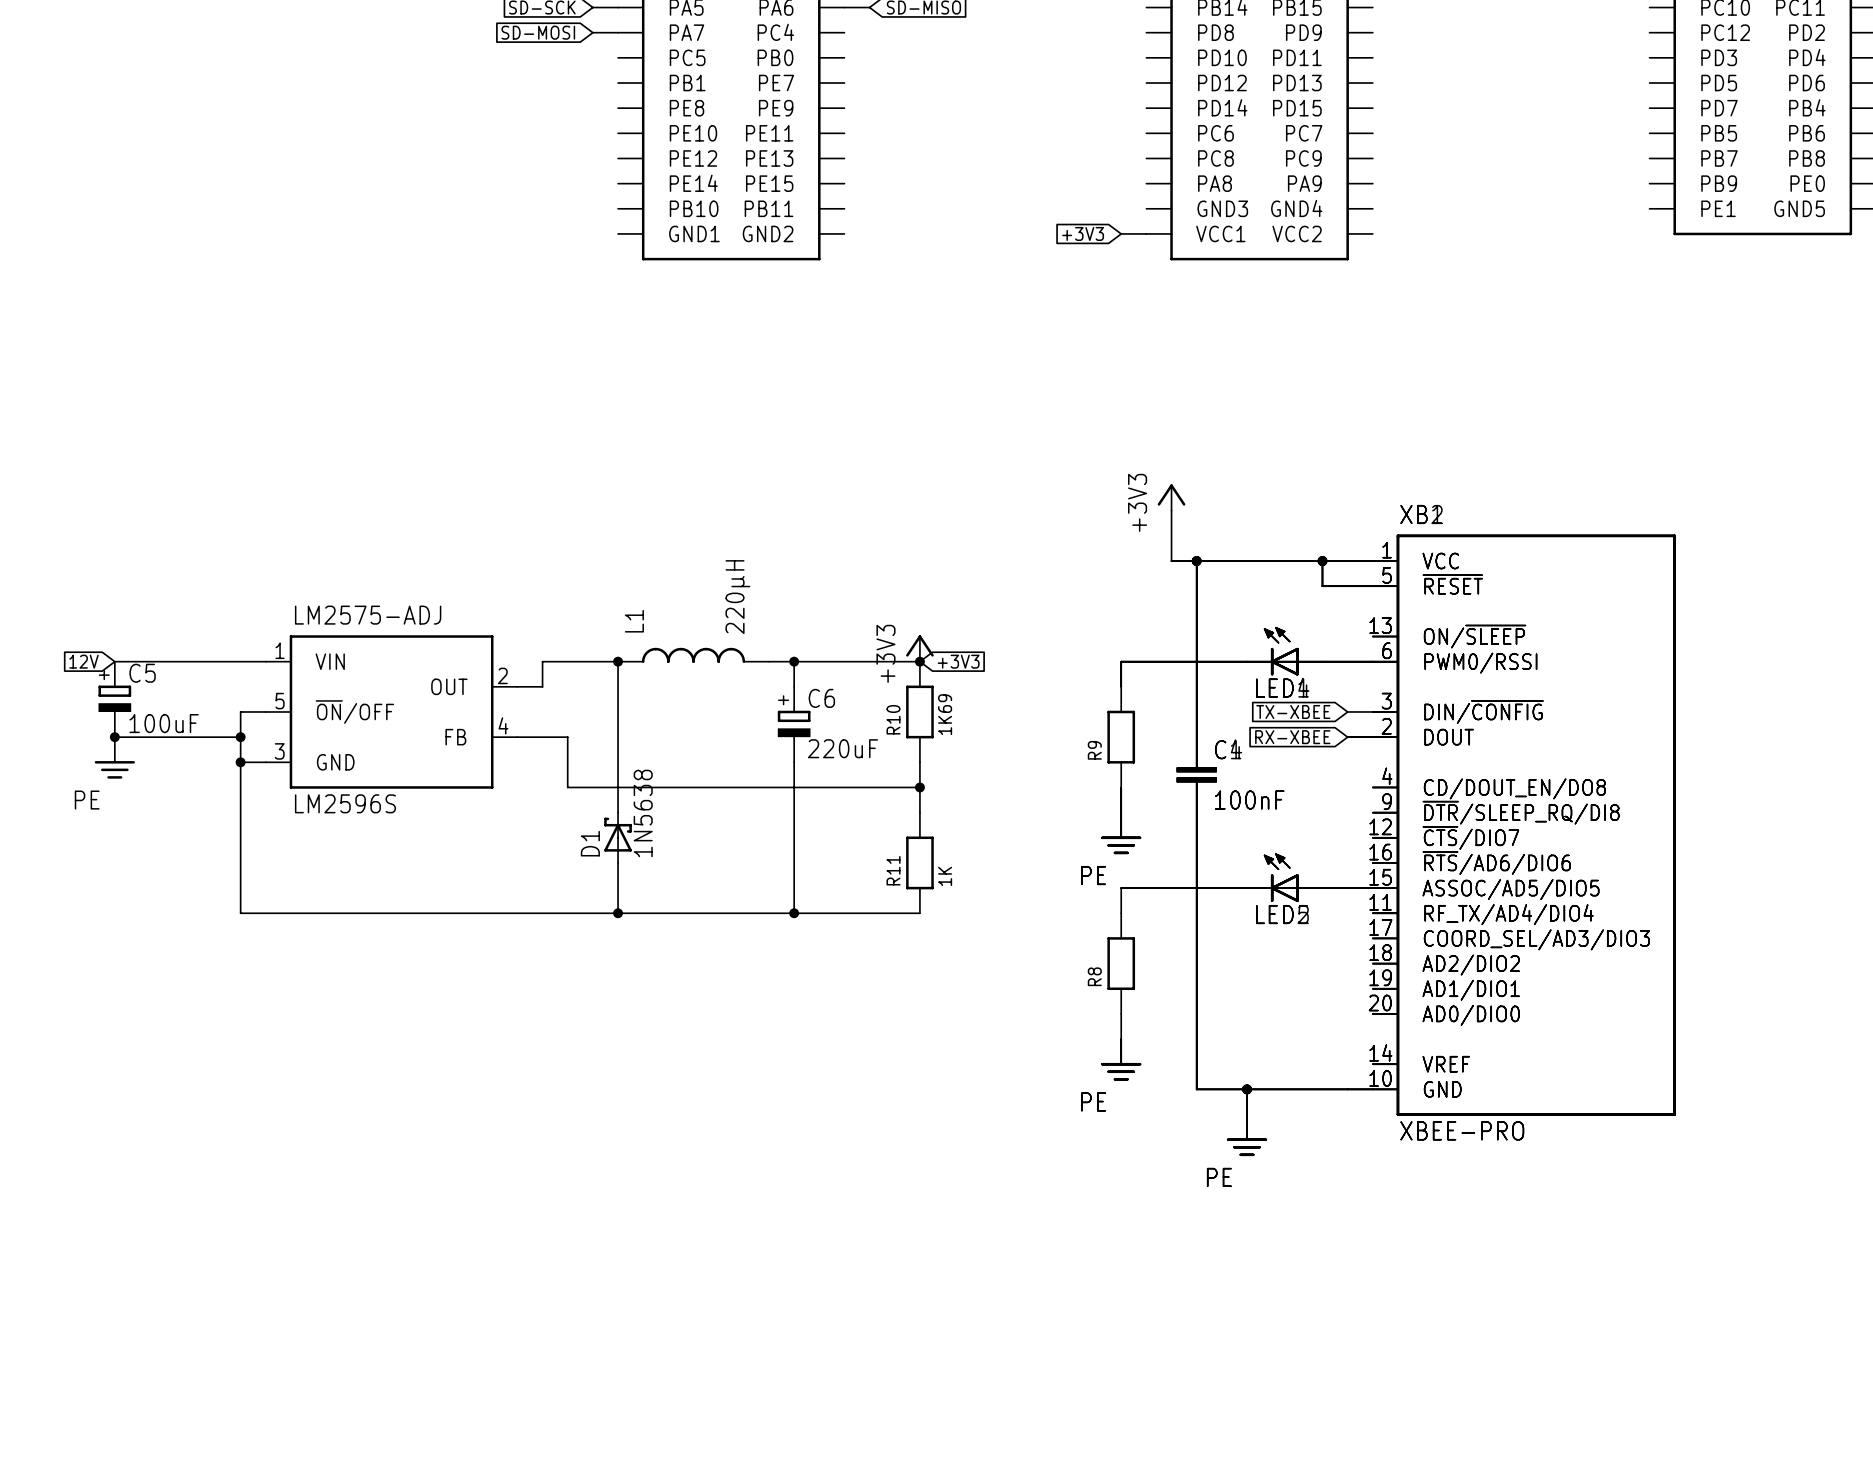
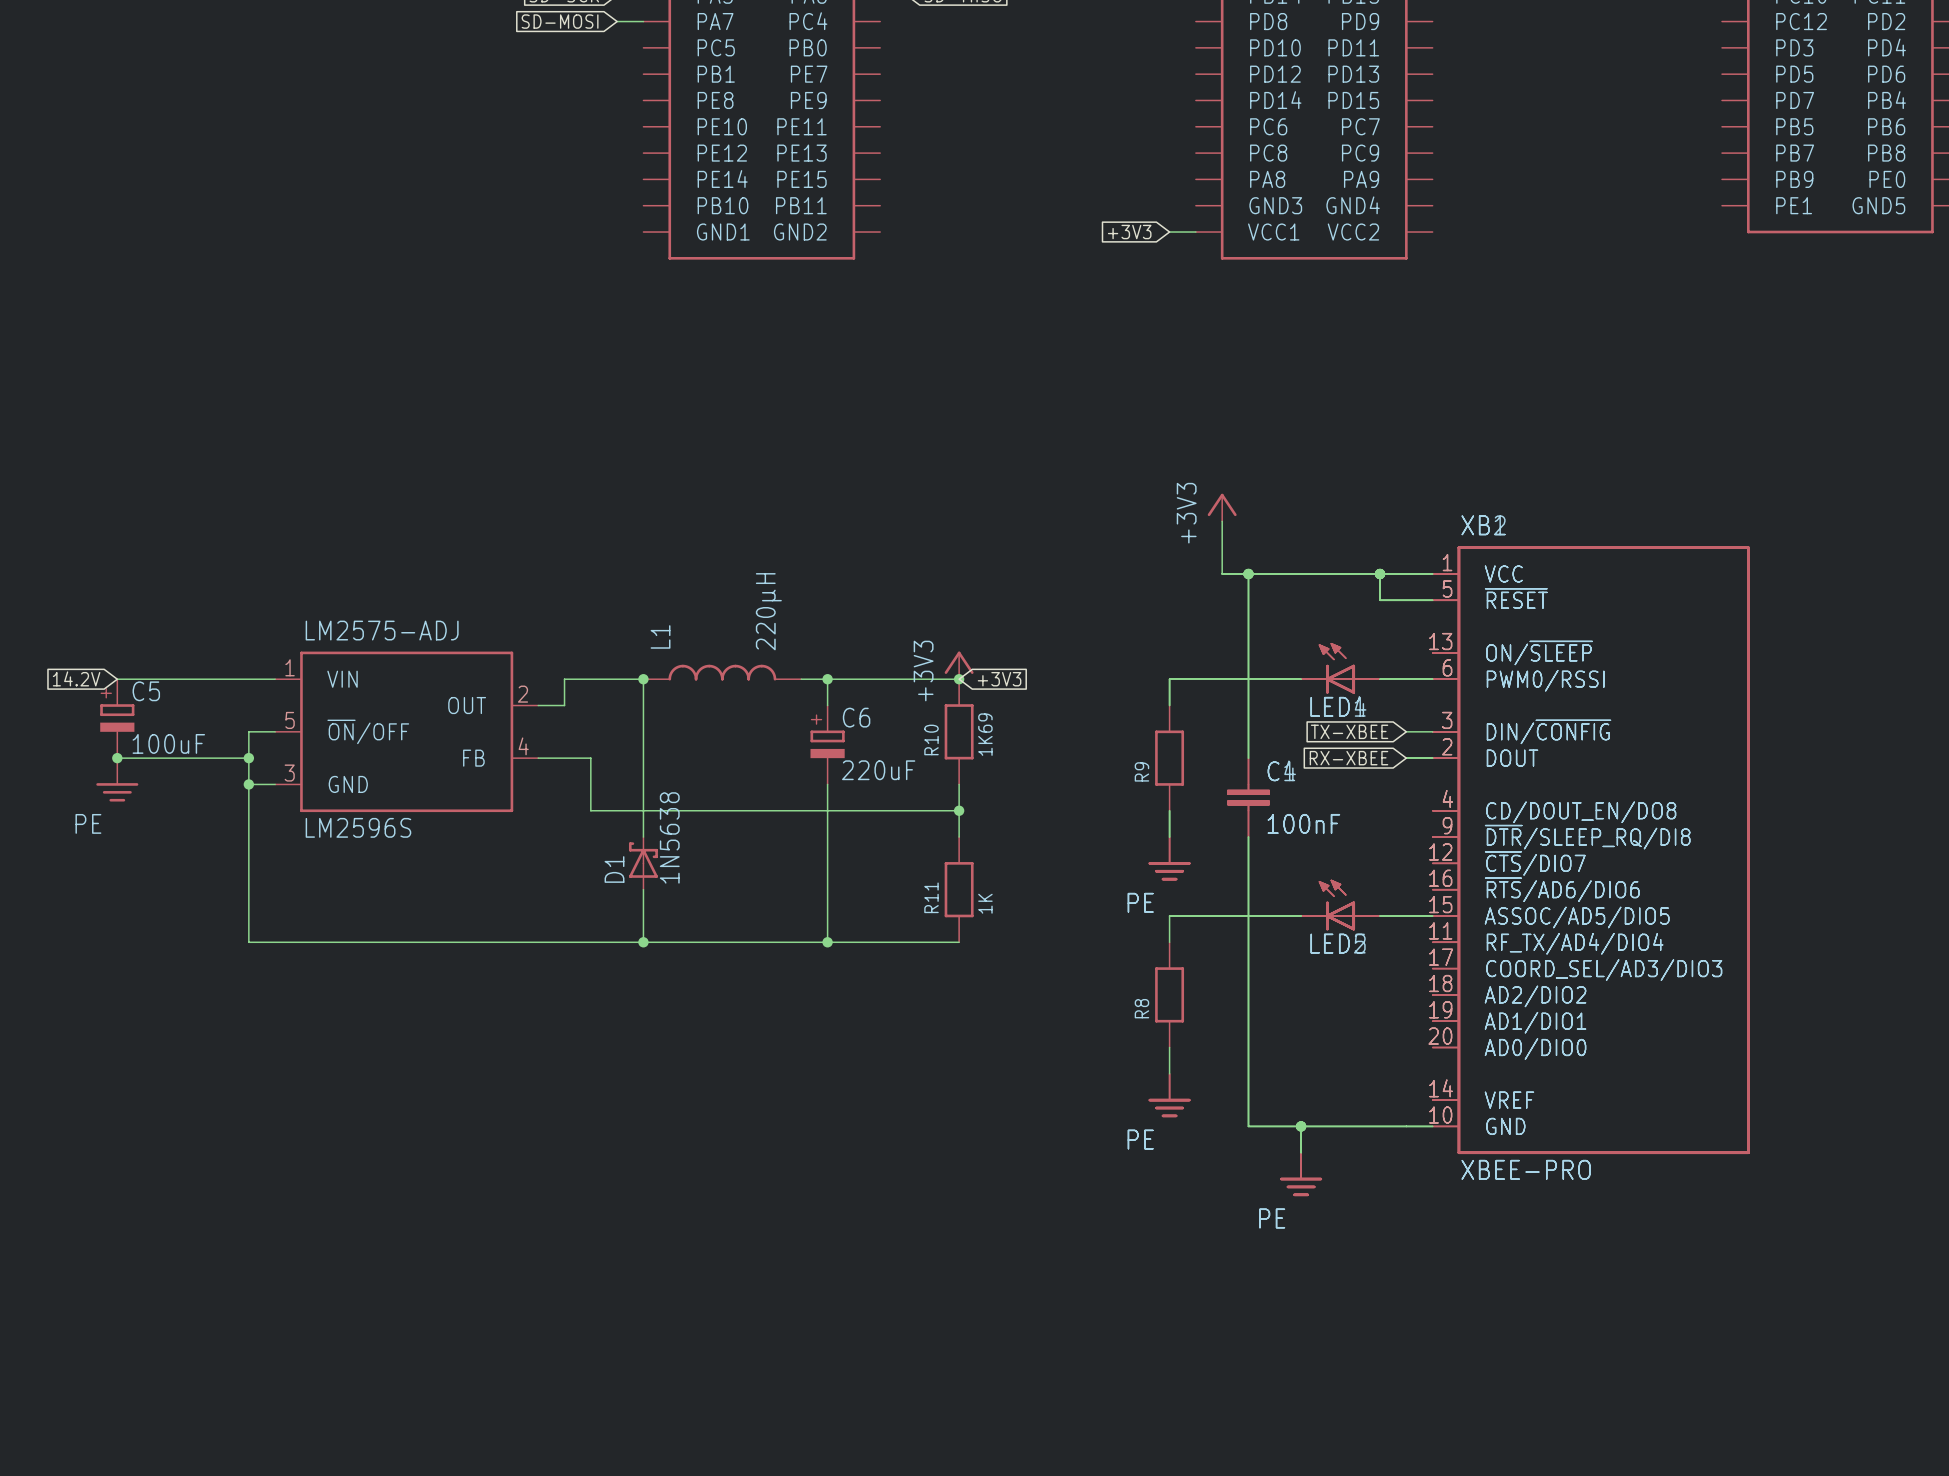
global label: 12V (83, 661) -> 14.2V (76, 678)

